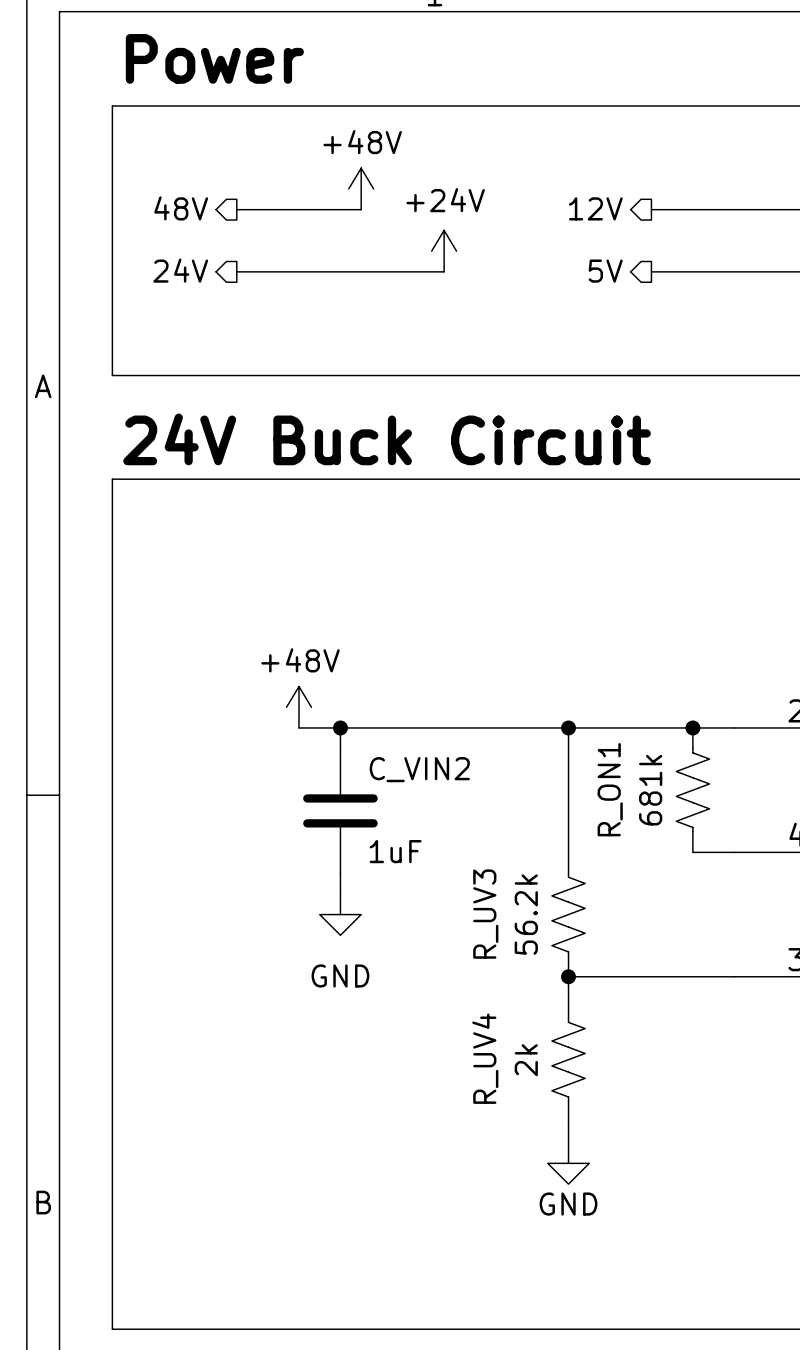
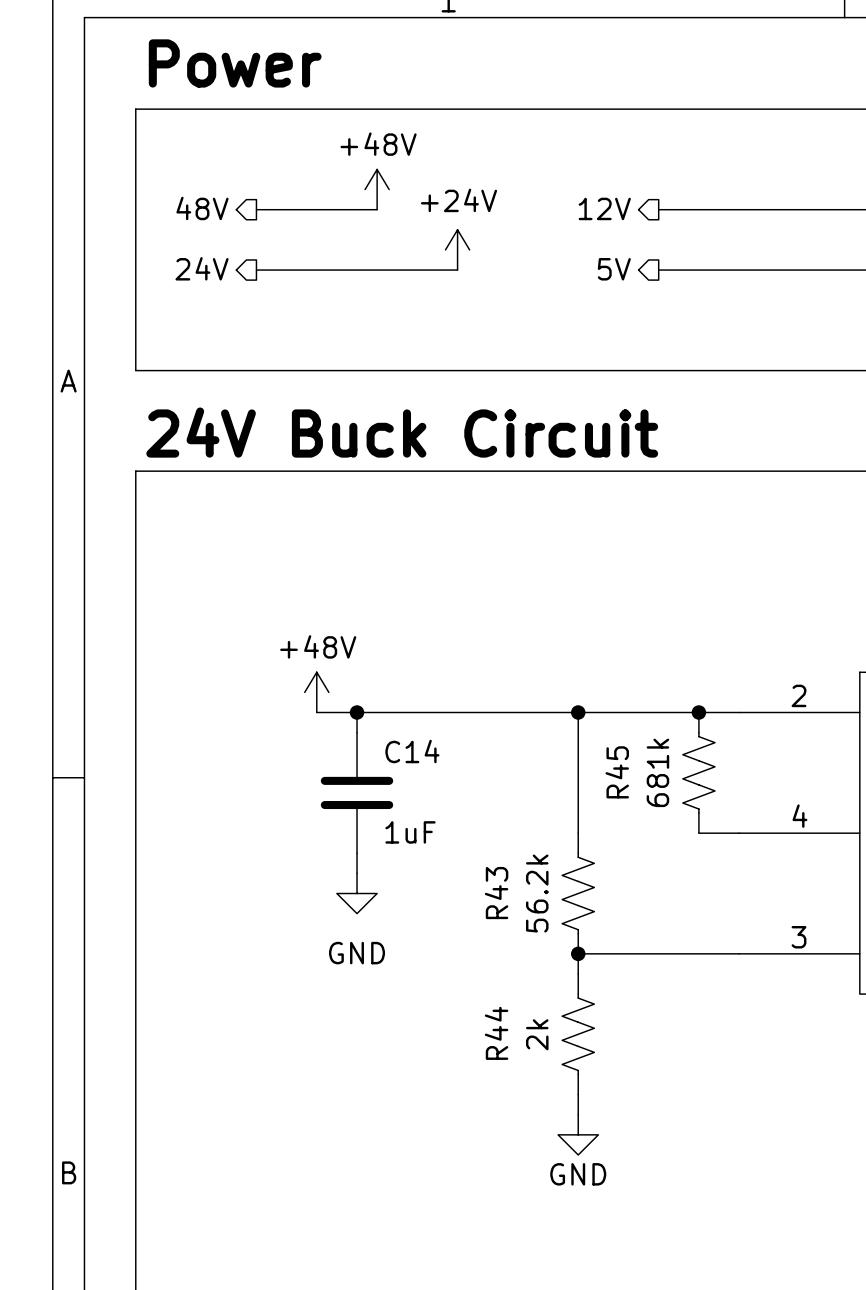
C_VIN2 name: C_VIN2 (419, 769) -> C14 (412, 751)
R_ON1 name: R_ON1 (610, 789) -> R45 (617, 772)
R_UV3 name: R_UV3 (485, 914) -> R43 (496, 893)
R_UV4 name: R_UV4 (485, 1058) -> R44 (496, 1033)

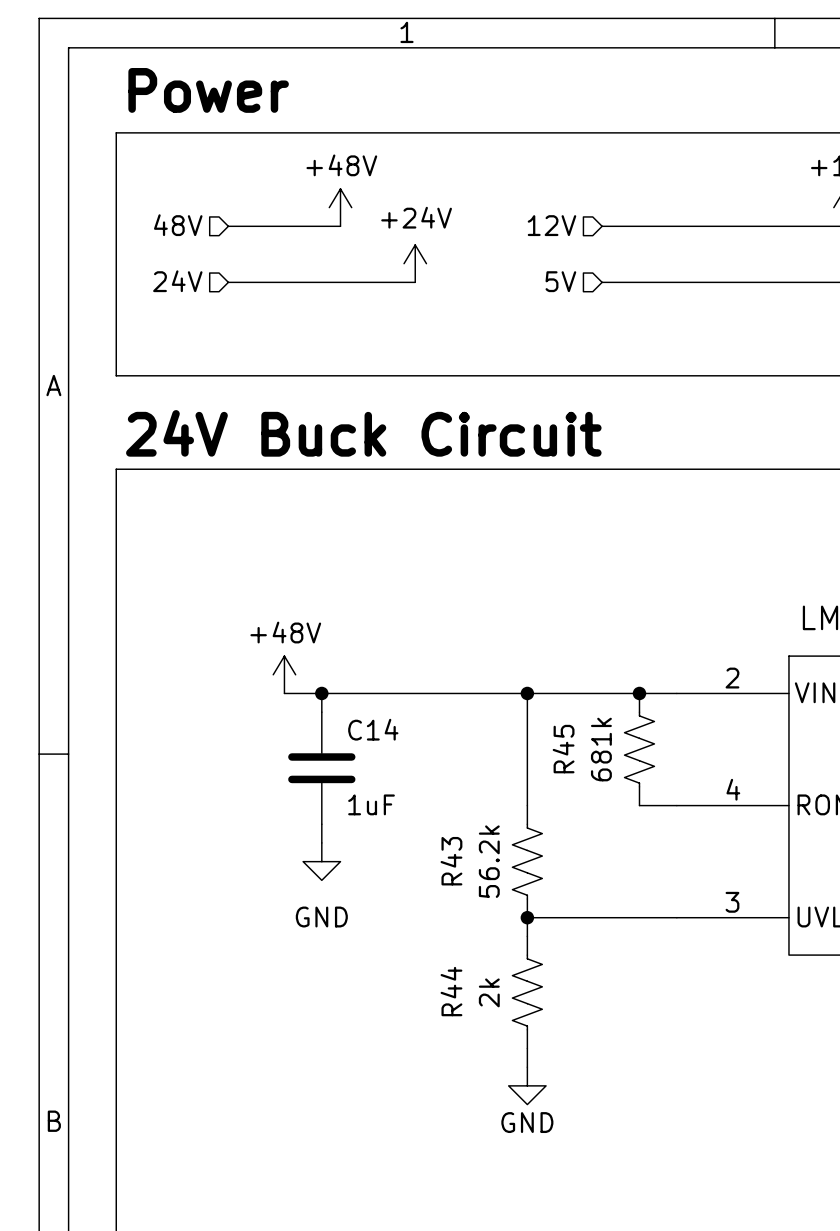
hierarchical label shape: output (202, 208) -> input (178, 225)
hierarchical label shape: output (604, 208) -> input (551, 225)
hierarchical label shape: output (202, 268) -> input (177, 281)
hierarchical label shape: output (614, 269) -> input (560, 281)

